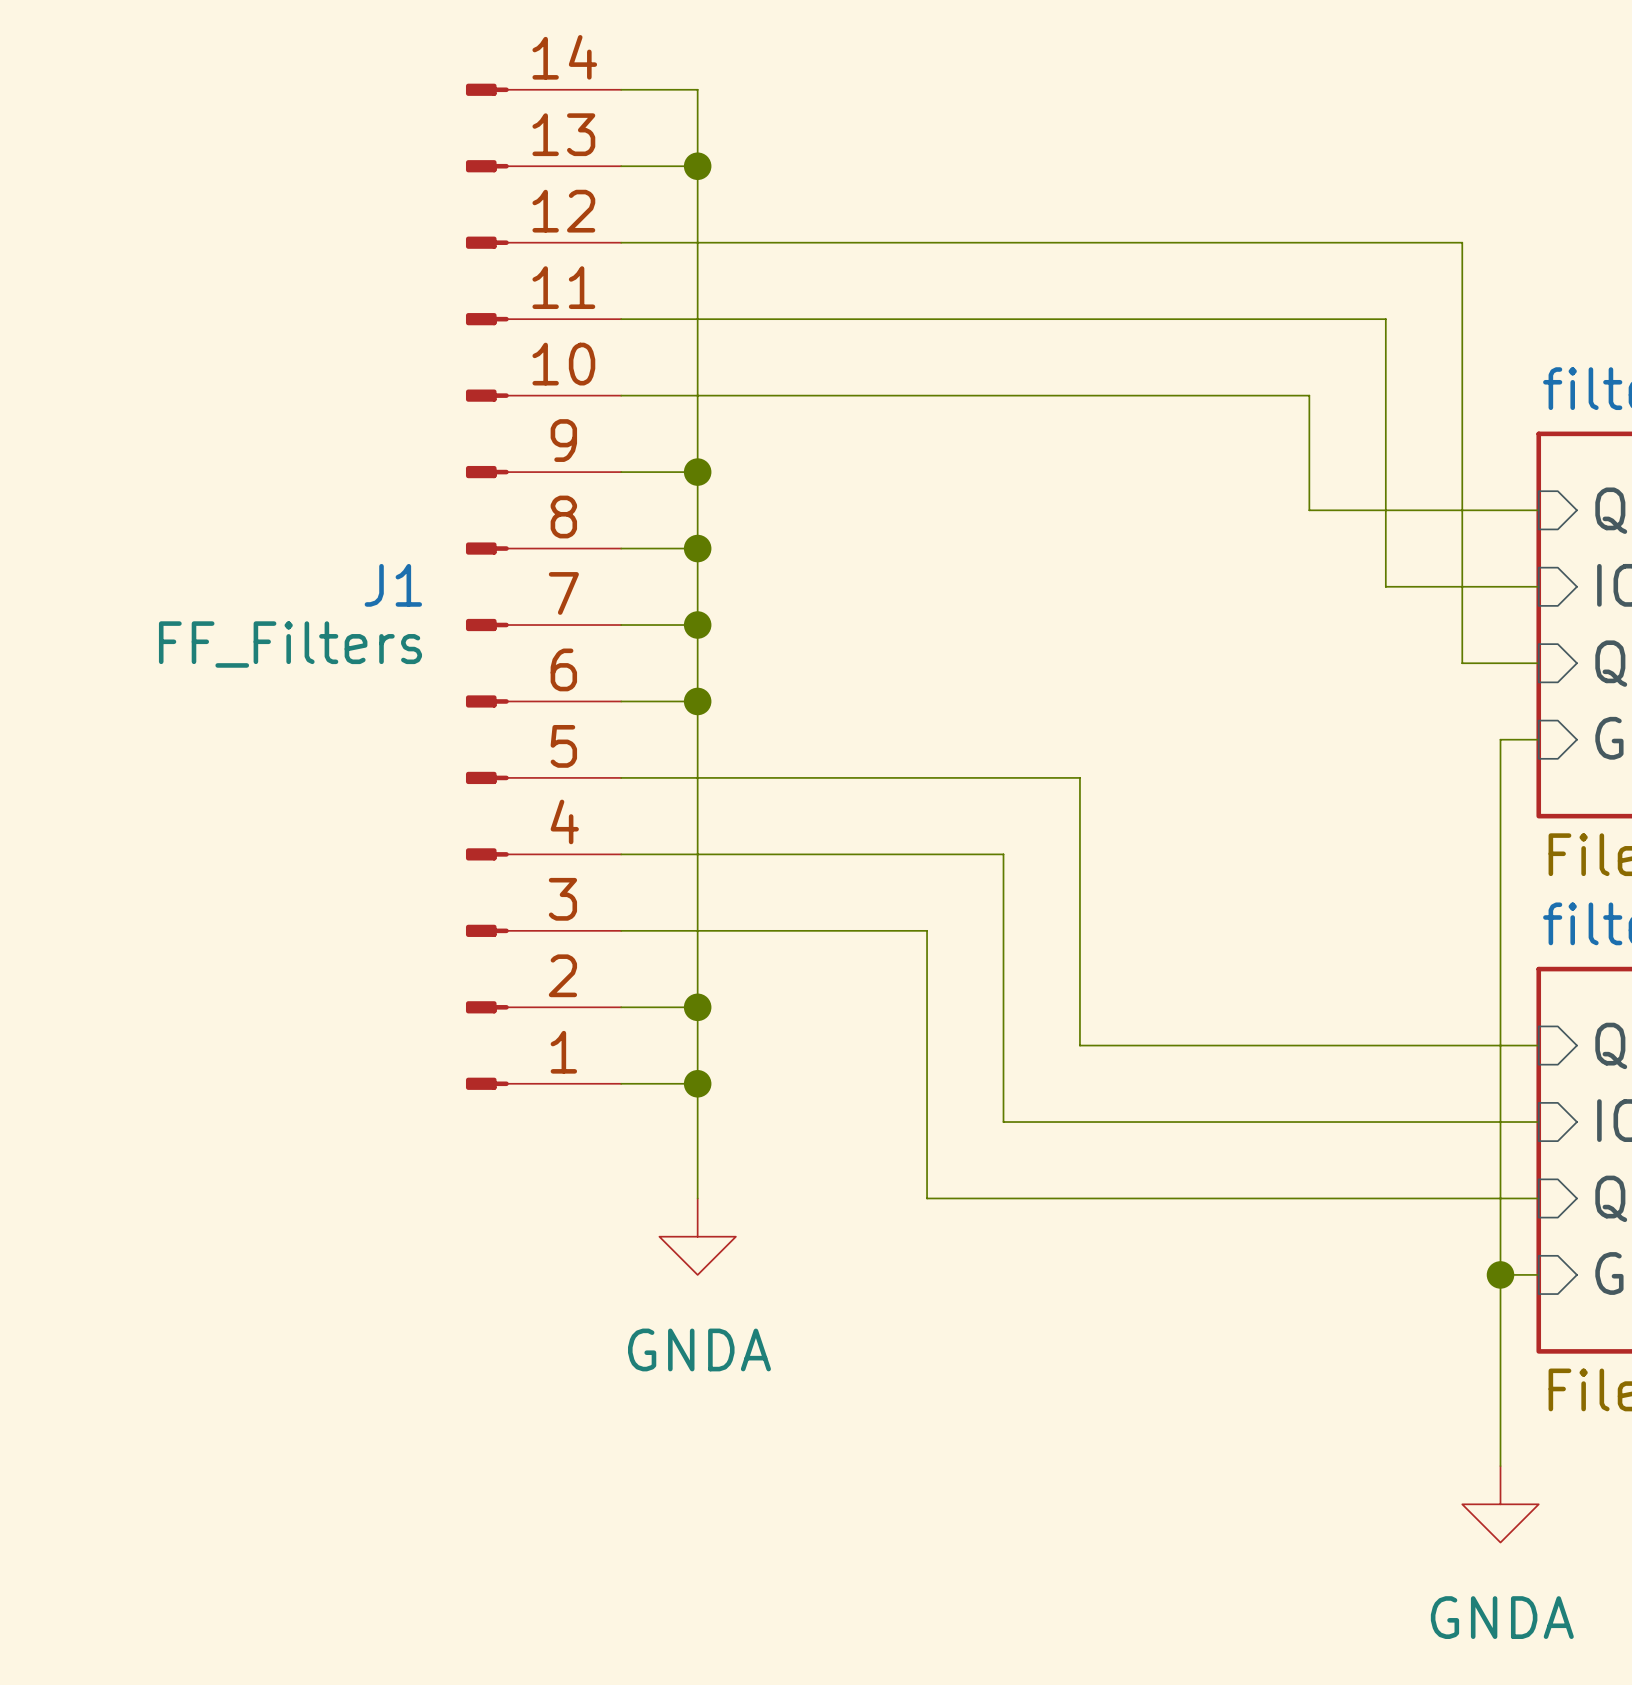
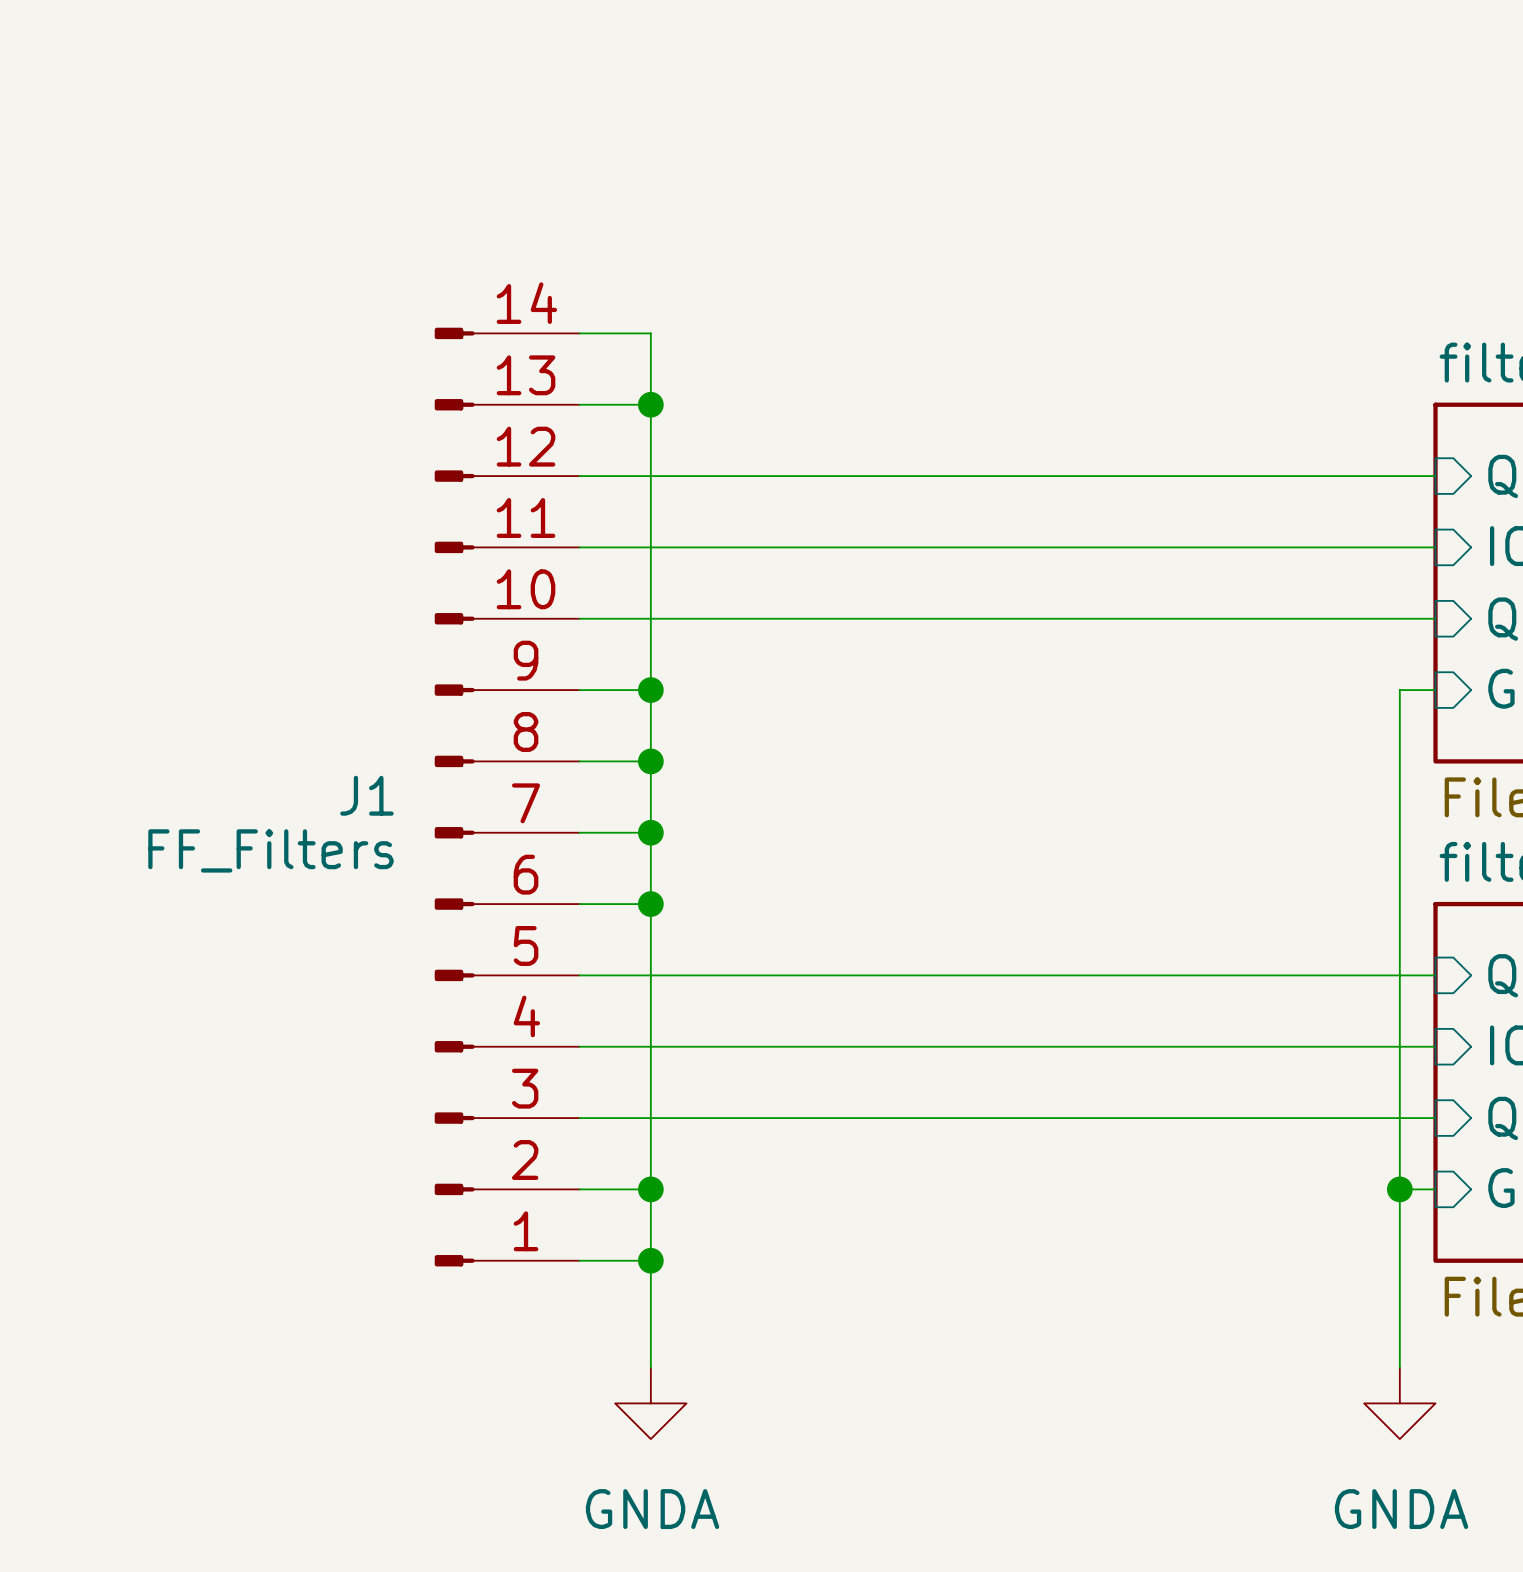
wire: (621, 89) (697, 89) (697, 357) -> (579, 333) (650, 333)
wire: (621, 166) (697, 166) -> (579, 404) (650, 404)
junction: (697, 166) -> none
wire: (621, 242) (1462, 242) (1462, 663) -> (579, 618) (1364, 618)
wire: (621, 319) (1385, 319) (1385, 586) -> (579, 547) (1292, 547)
wire: (621, 395) (1309, 395) (1309, 510) -> (579, 476) (1221, 476)
wire: (621, 472) (697, 472) -> (579, 690) (650, 690)
junction position: (697, 472) -> (650, 404)
wire: (621, 548) (697, 548) -> (579, 761) (650, 761)
junction: (697, 548) -> none
J1 position: (543, 586) -> (507, 797)
wire: (621, 625) (697, 625) -> (579, 832) (650, 832)
junction: (697, 625) -> none
wire: (621, 701) (697, 701) -> (579, 904) (650, 904)
junction position: (697, 701) -> (650, 690)
wire: (621, 777) (1079, 777) (1079, 1045) -> (579, 975) (1007, 975)
junction: none -> (650, 761)
wire: (621, 854) (1003, 854) (1003, 1122) -> (579, 1046) (936, 1046)
junction: none -> (650, 832)
wire: (621, 930) (927, 930) (927, 1198) -> (579, 1118) (864, 1118)
wire: (621, 1007) (697, 1007) -> (579, 1189) (650, 1189)
junction position: (697, 1007) -> (650, 904)
wire: (621, 1083) (697, 1083) -> (579, 1260) (650, 1260)
junction: (697, 1083) -> none
wire: none -> (650, 1118) (650, 1367)
power symbol position: GNDA (697, 1236) -> GNDA (650, 1403)
junction: none -> (650, 1189)
junction: none -> (650, 1260)

